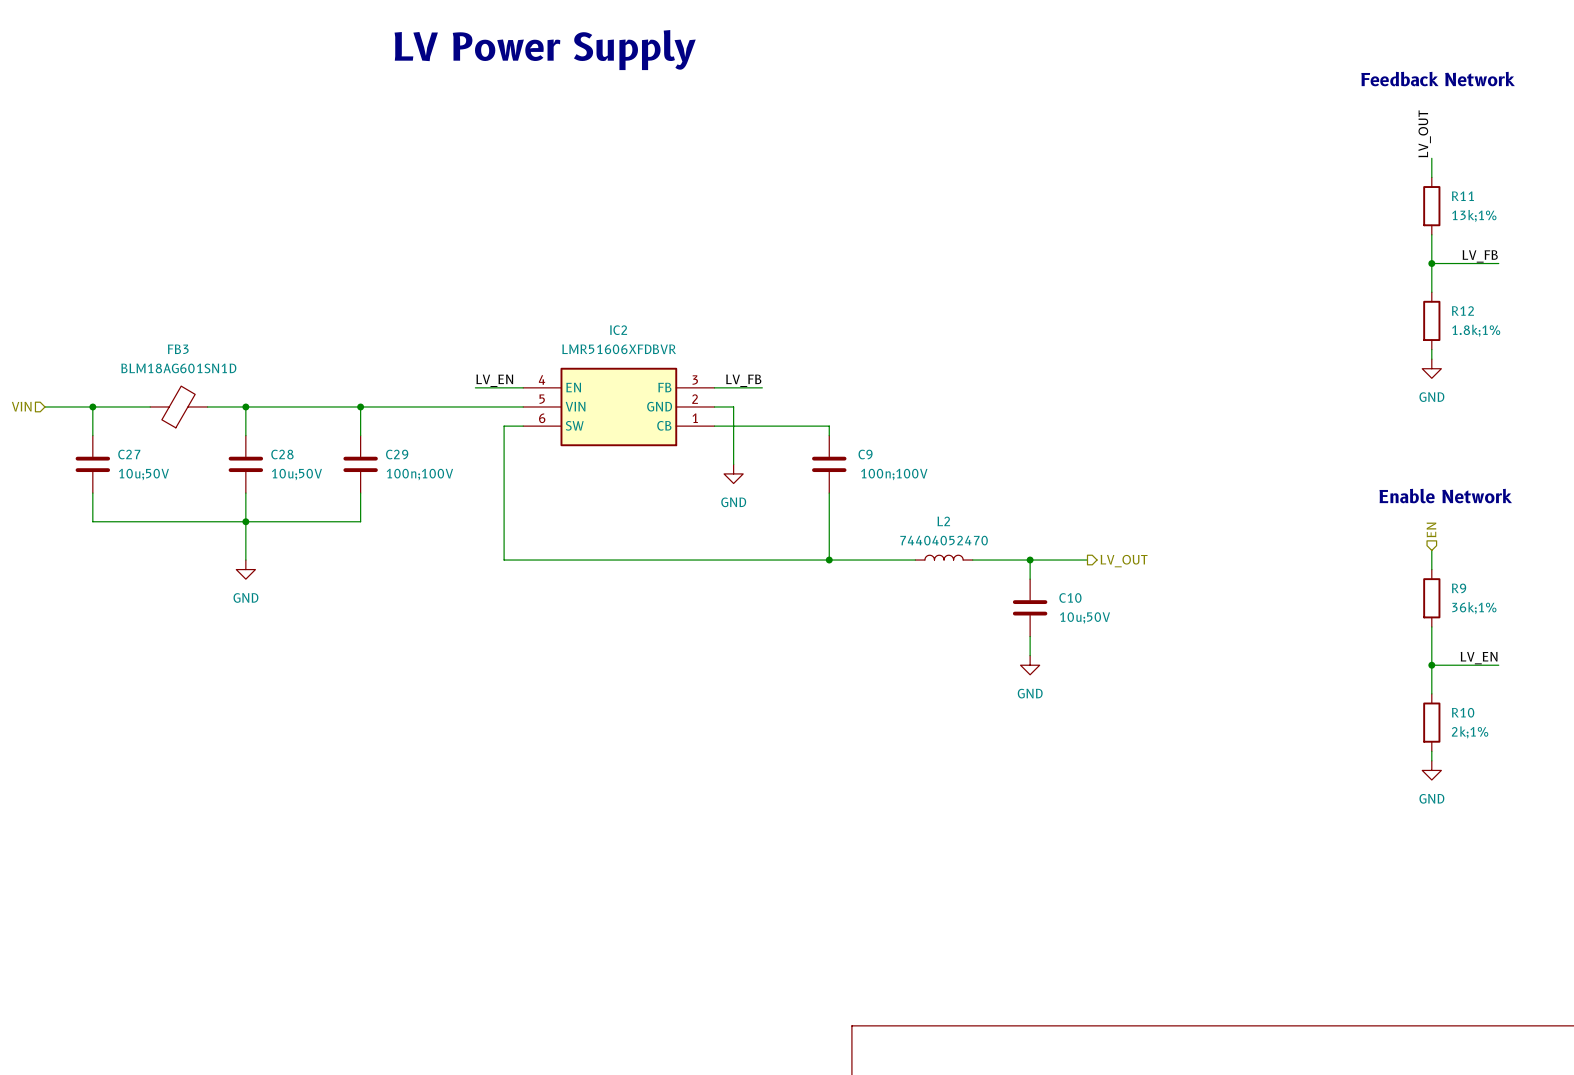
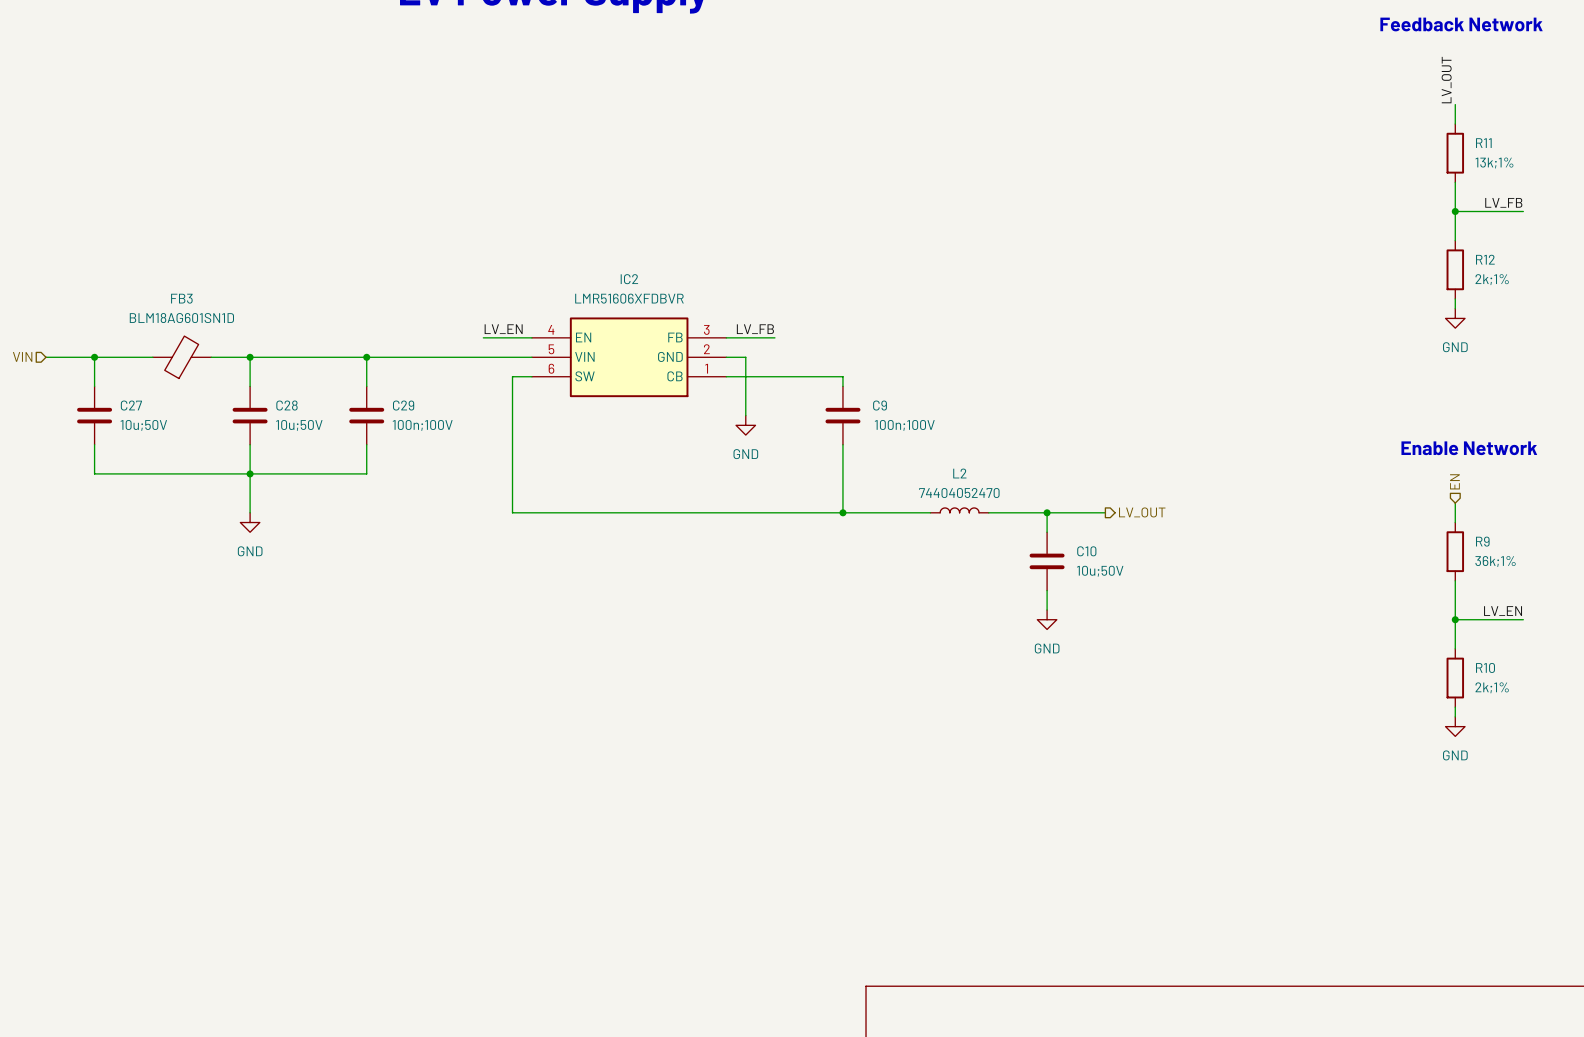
R12 value: 1.8k;1% (1476, 330) -> 2k;1% (1492, 279)

